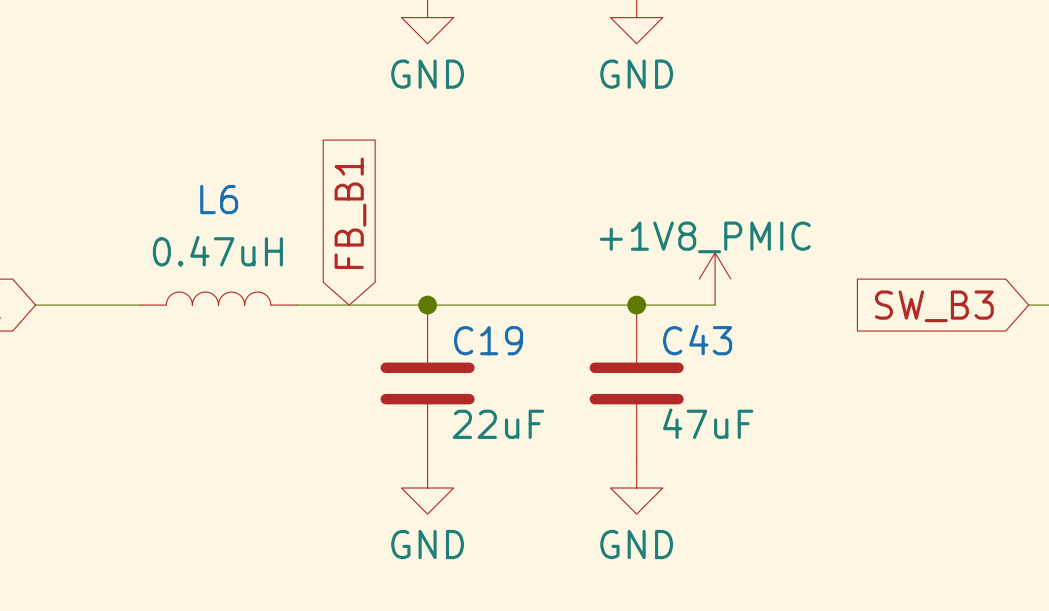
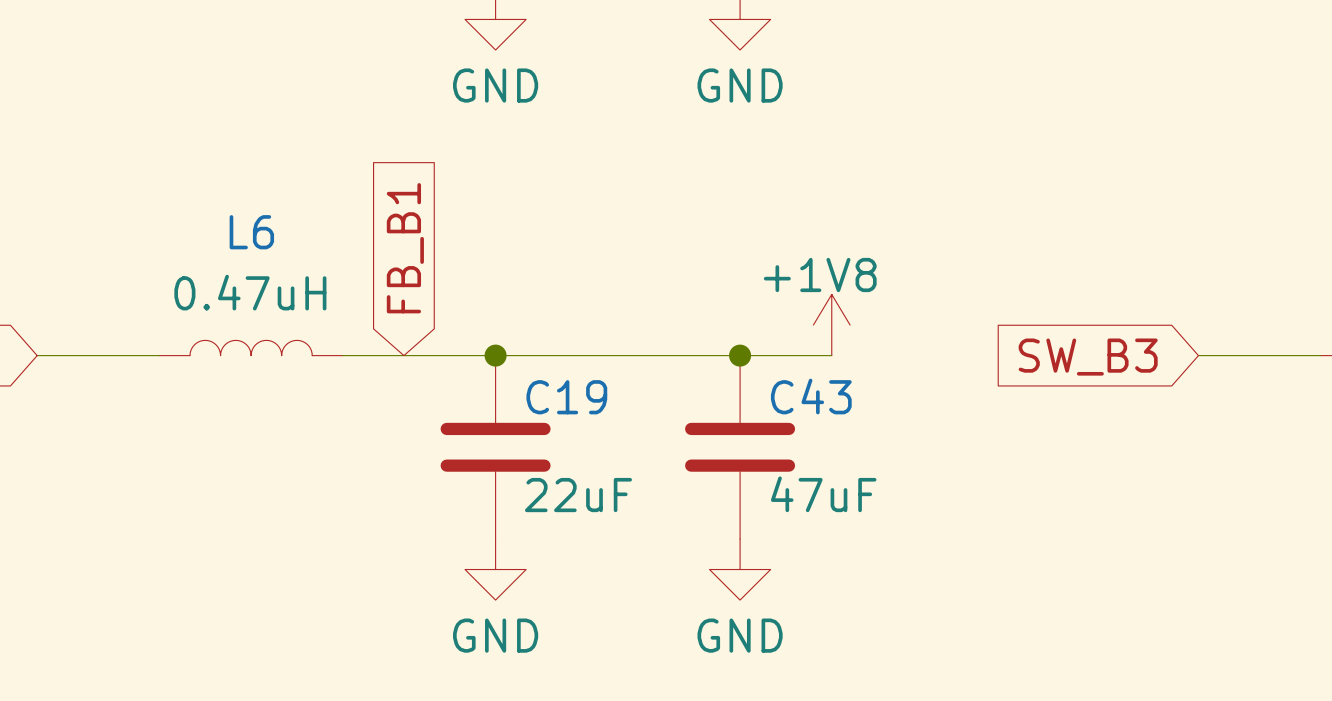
power symbol: +1V8_PMIC (715, 278) -> +1V8 (831, 325)

